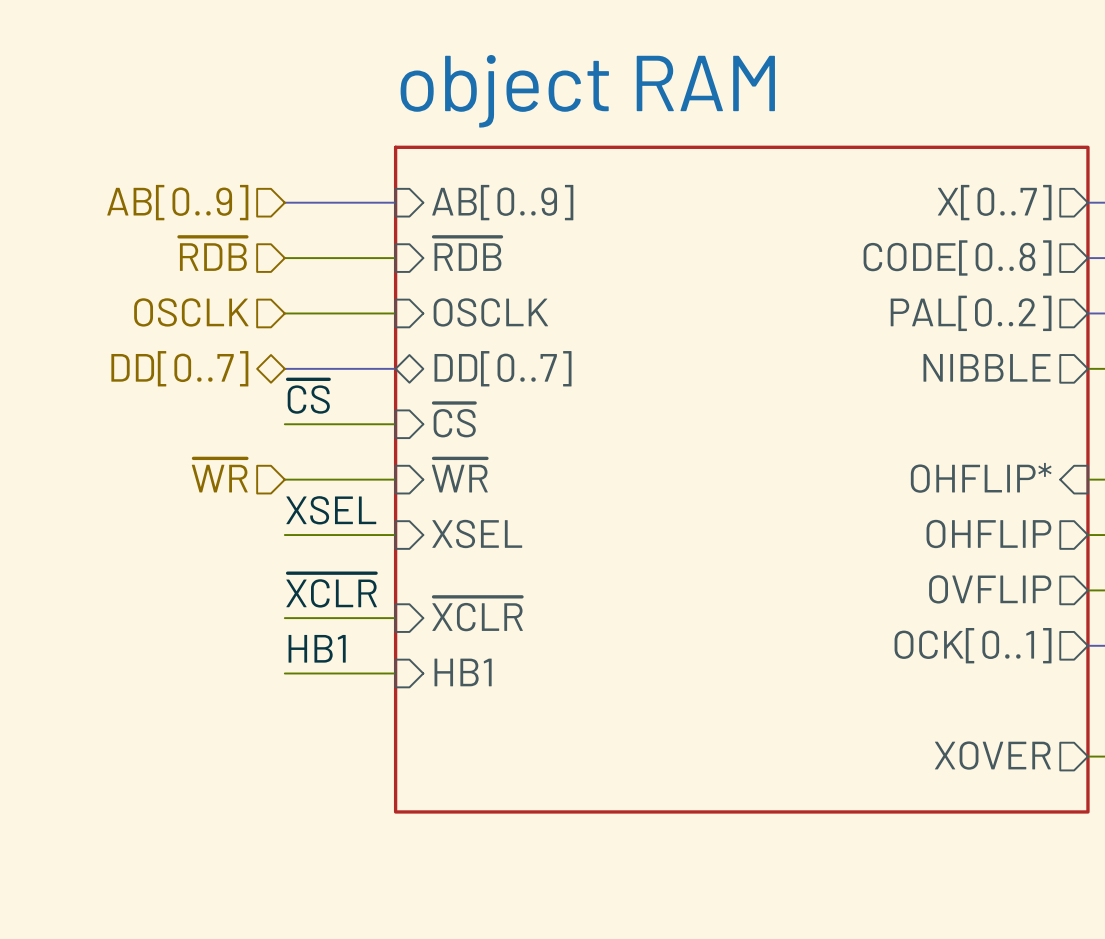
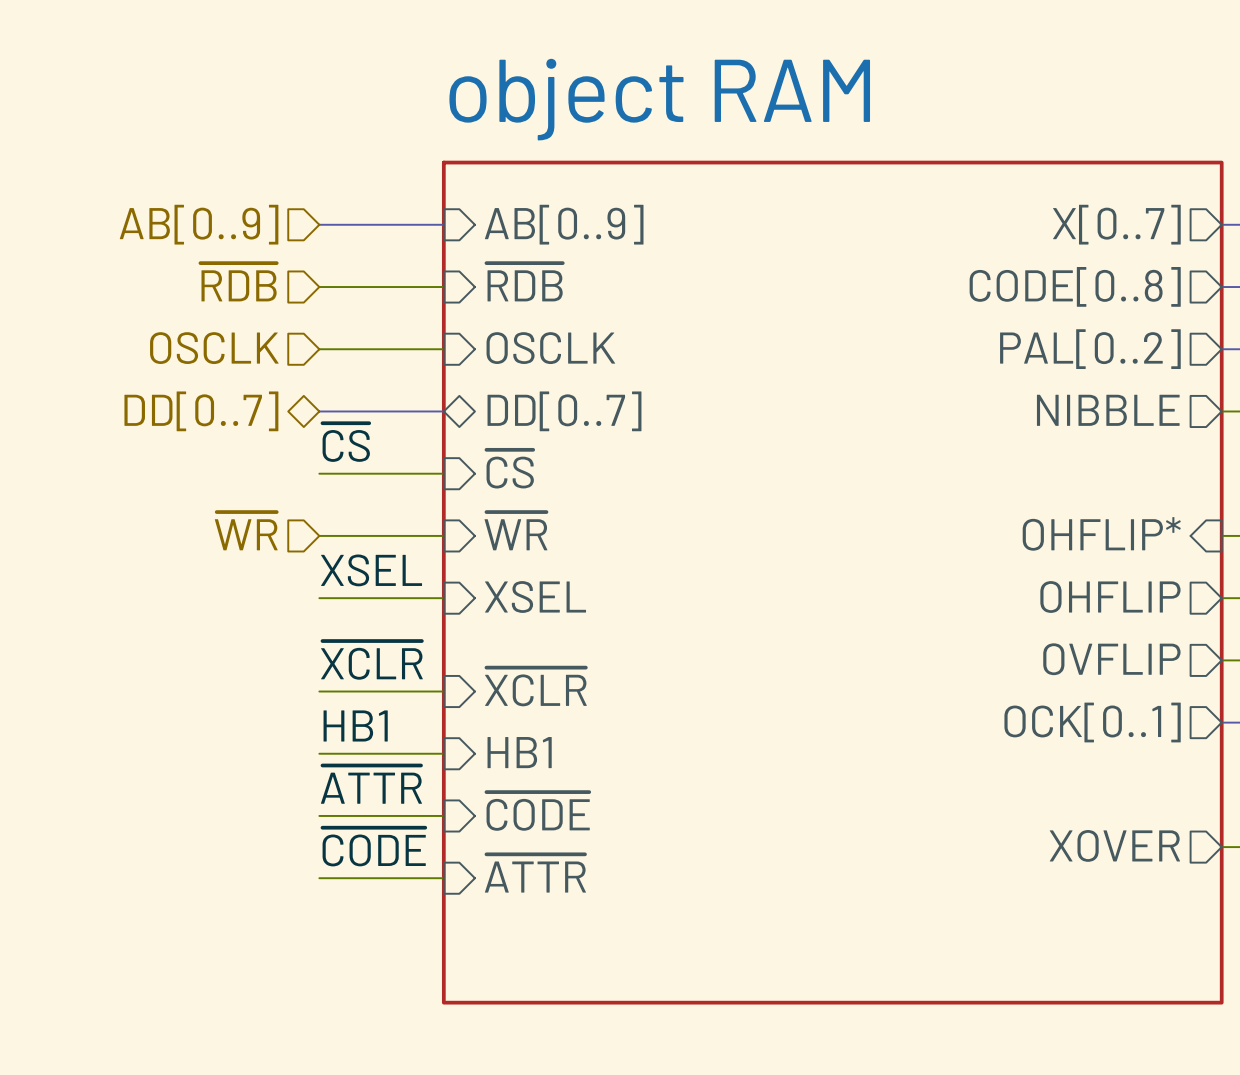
sheet object RAM: (741, 479) -> none
sheet object RAM: none -> (832, 582)
label: none -> ~{ATTR} (371, 784)
sheet pin: none -> ~{CODE} (538, 811)
wire: none -> (319, 815) (443, 815)
label: none -> ~{CODE} (374, 847)
sheet pin: none -> ~{ATTR} (535, 873)
wire: none -> (319, 878) (443, 878)

